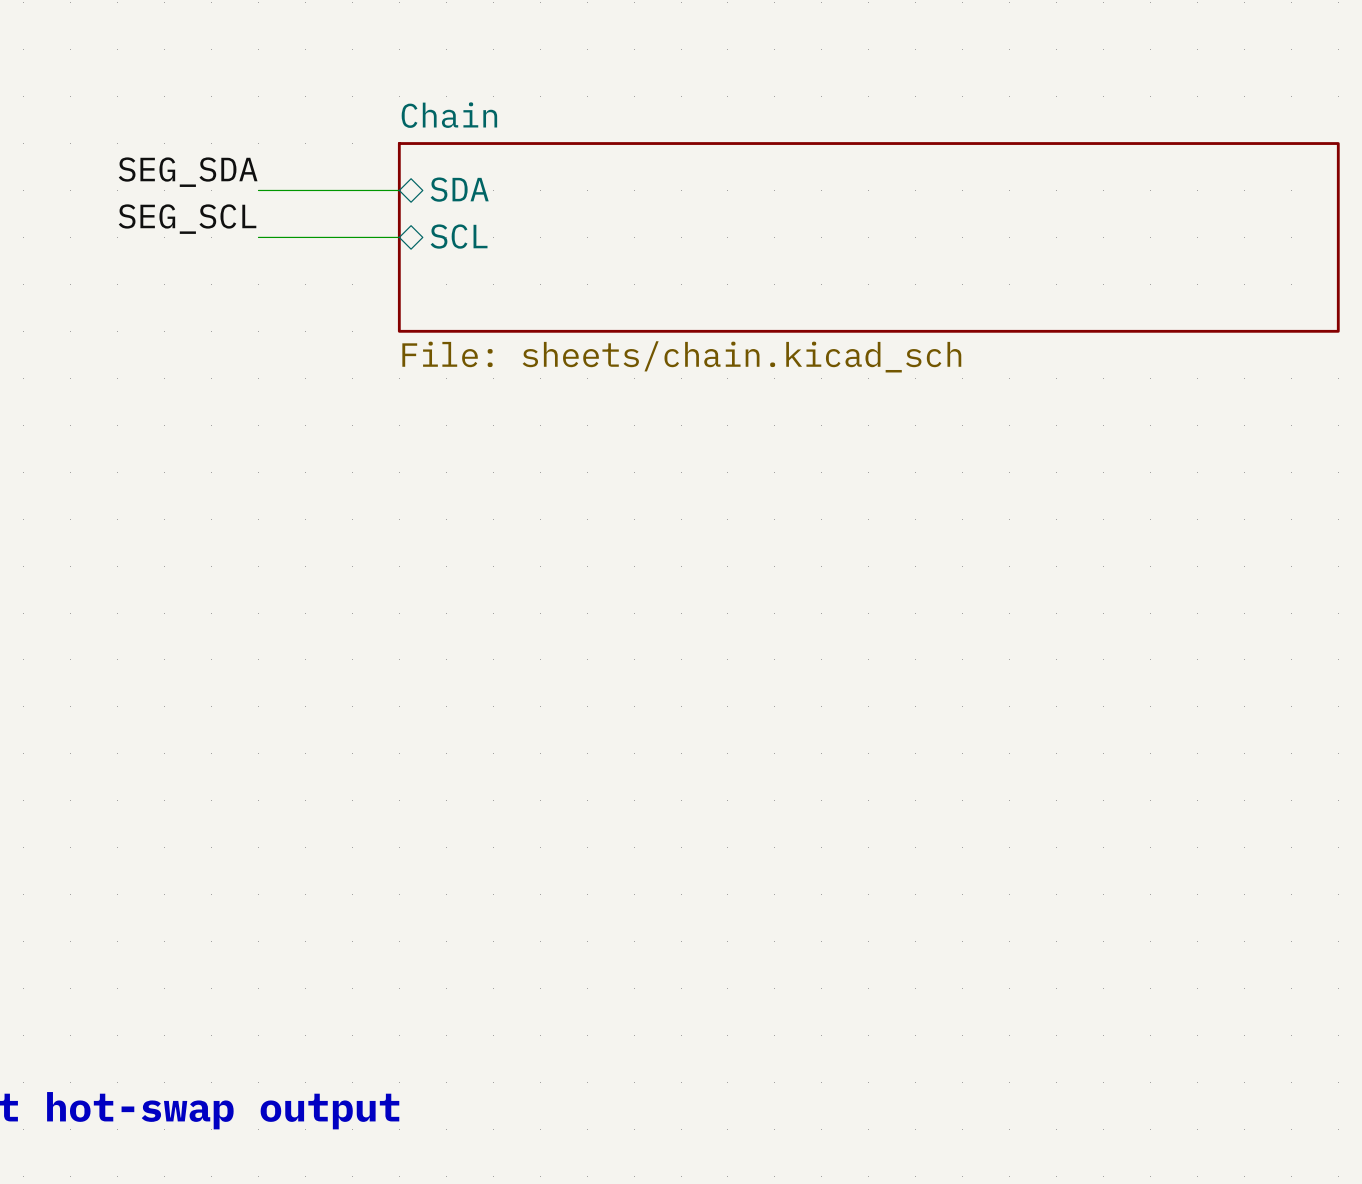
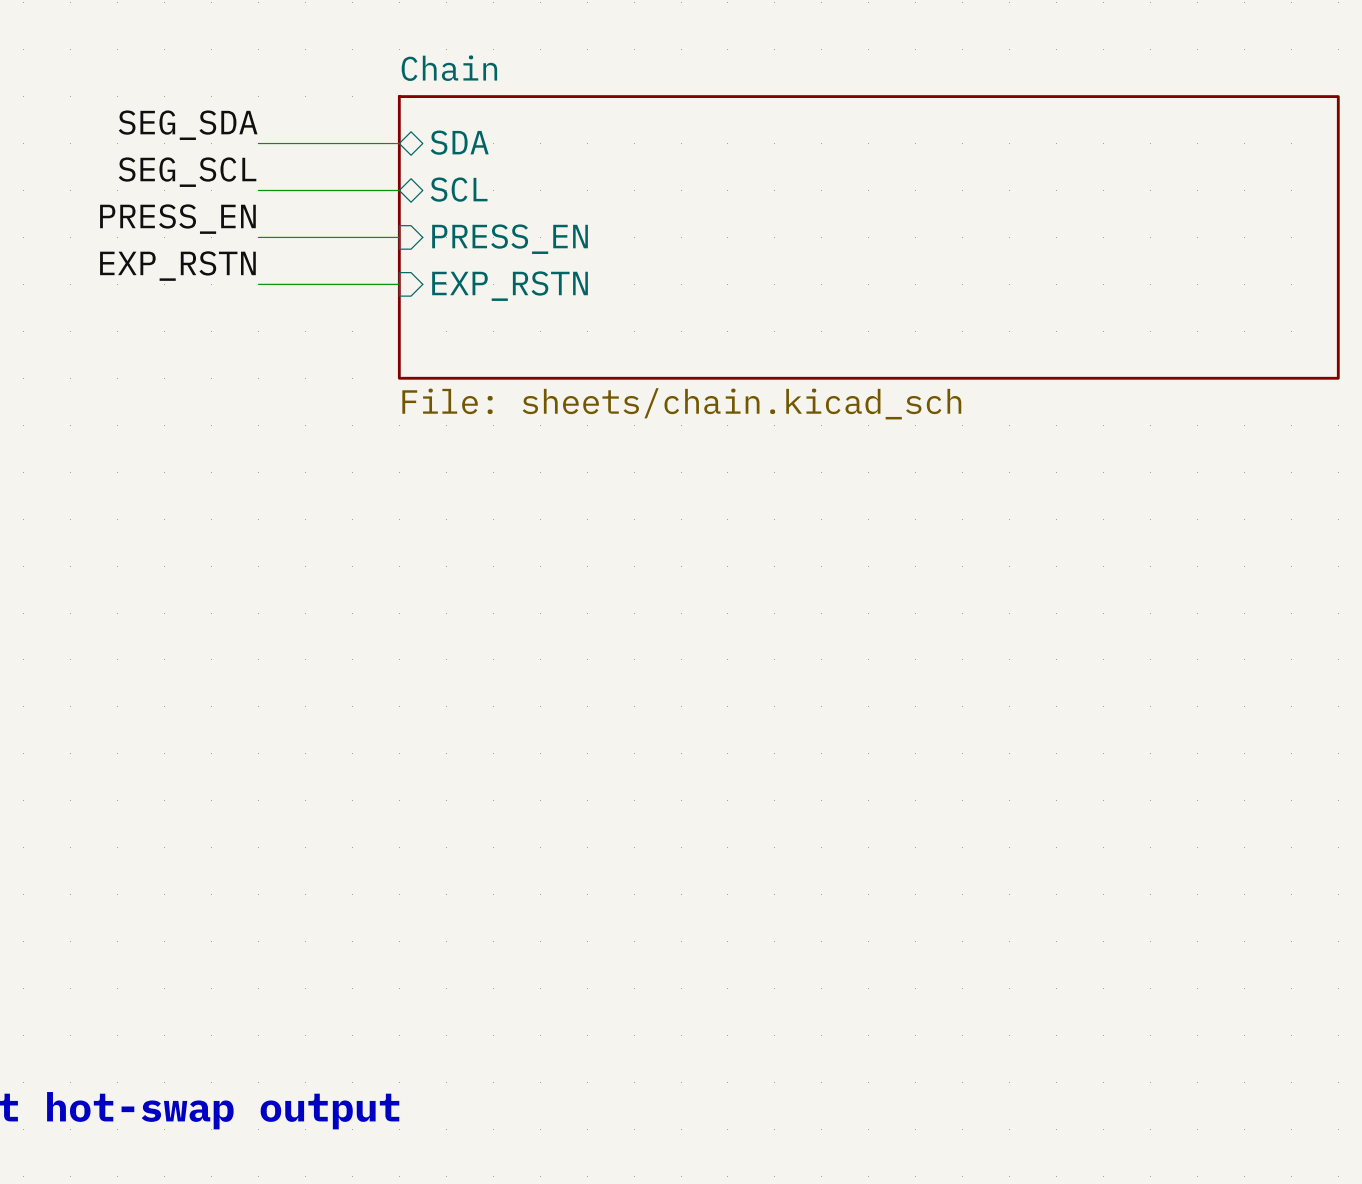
sheet Chain name position: Chain (449, 115) -> Chain (449, 68)
label: none -> SEG_SDA (188, 125)
sheet Chain shape: [397, 142, 1340, 333] -> [397, 95, 1340, 380]
sheet pin: none -> SDA (459, 142)
wire: none -> (258, 143) (399, 143)
label: SEG_SDA (188, 172) -> SEG_SCL (187, 172)
sheet pin: SDA (459, 189) -> SCL (459, 189)
label: SEG_SCL (187, 219) -> PRESS_EN (177, 219)
sheet pin shape: bidirectional (459, 236) -> input (510, 239)
sheet pin: SCL (459, 236) -> PRESS_EN (510, 239)
label: none -> EXP_RSTN (177, 266)
wire: none -> (258, 284) (399, 284)
sheet pin: none -> EXP_RSTN (510, 286)
sheet Chain value position: File: sheets/chain.kicad_sch (681, 356) -> File: sheets/chain.kicad_sch (681, 403)

